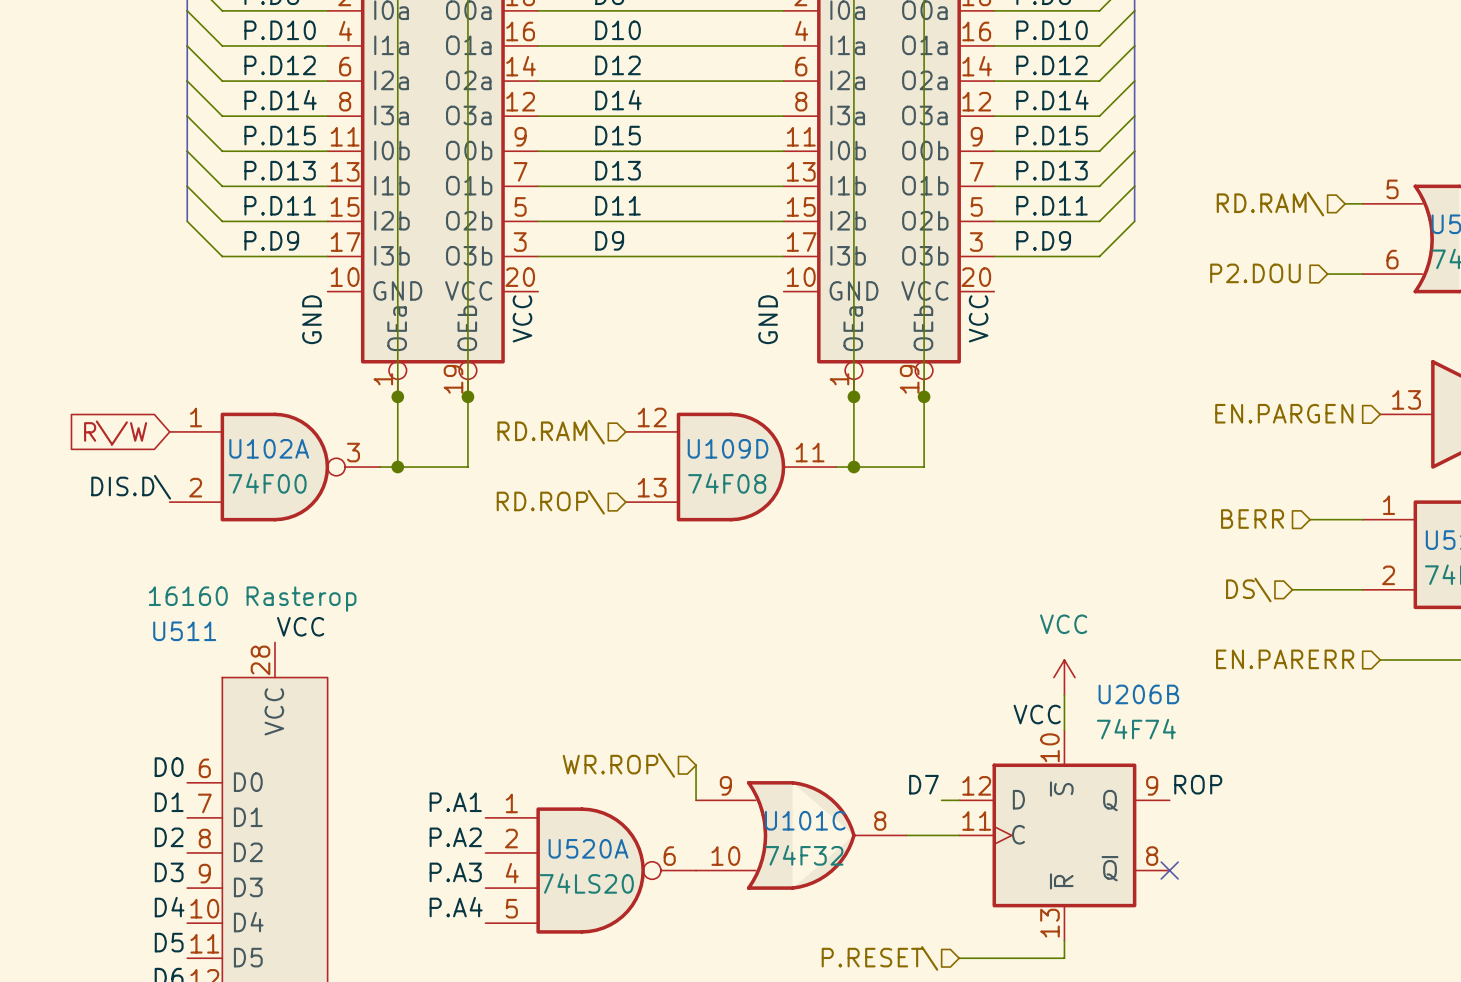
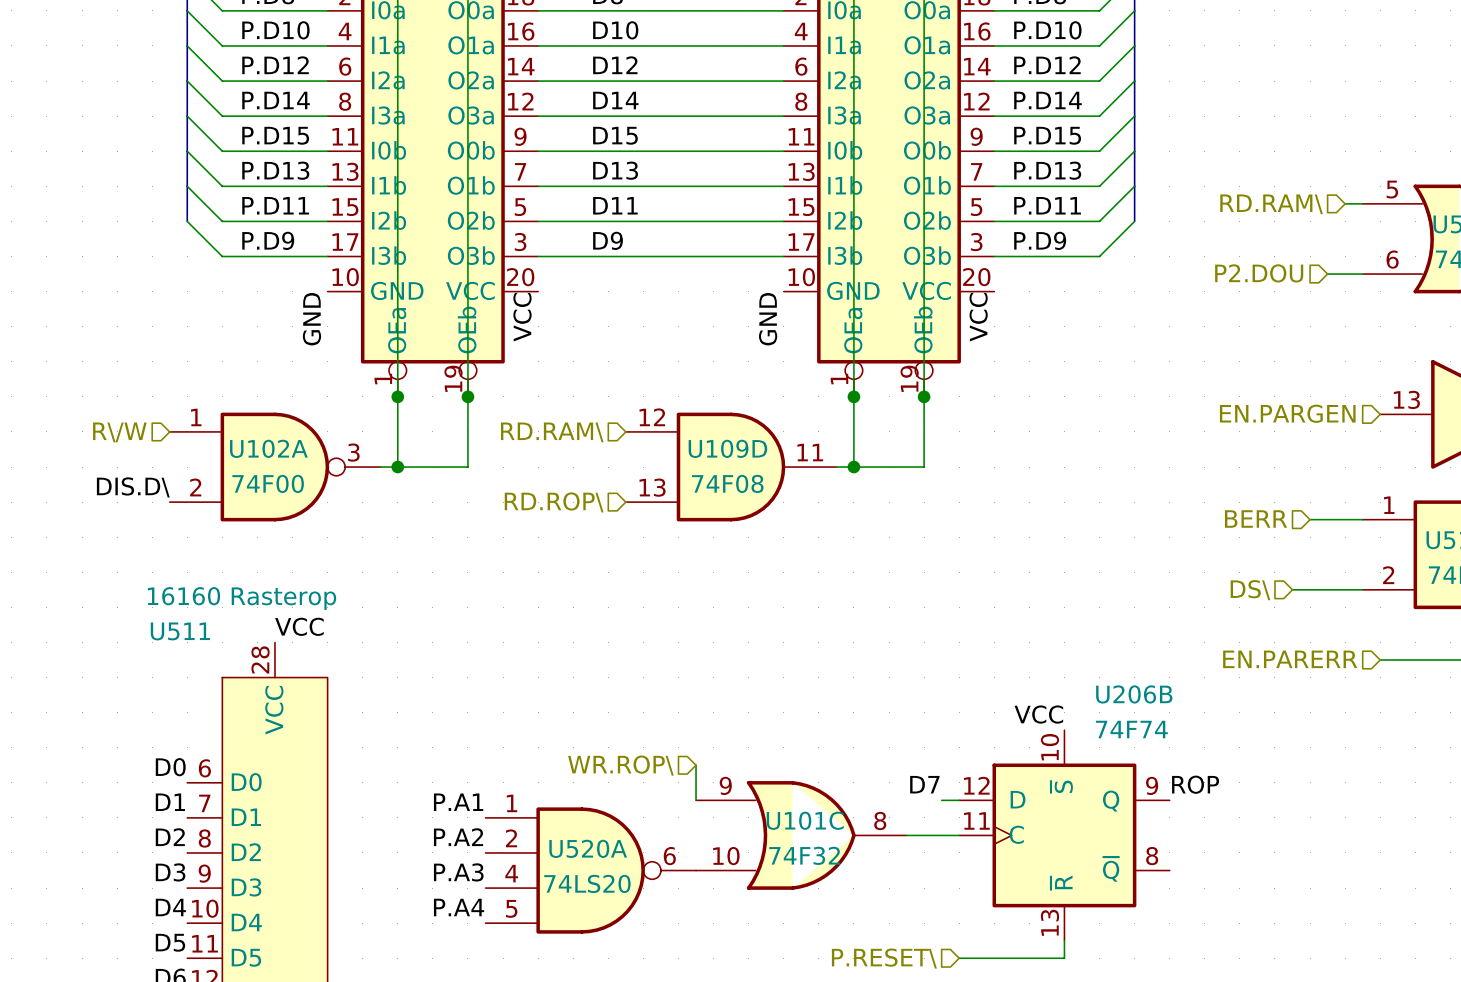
hierarchical label: none -> R\/W (119, 432)
global label: R\/W (115, 433) -> none
power symbol: VCC (1064, 677) -> none
wire: (1064, 695) (1064, 730) -> none
no-connect mark: (1169, 870) -> none

